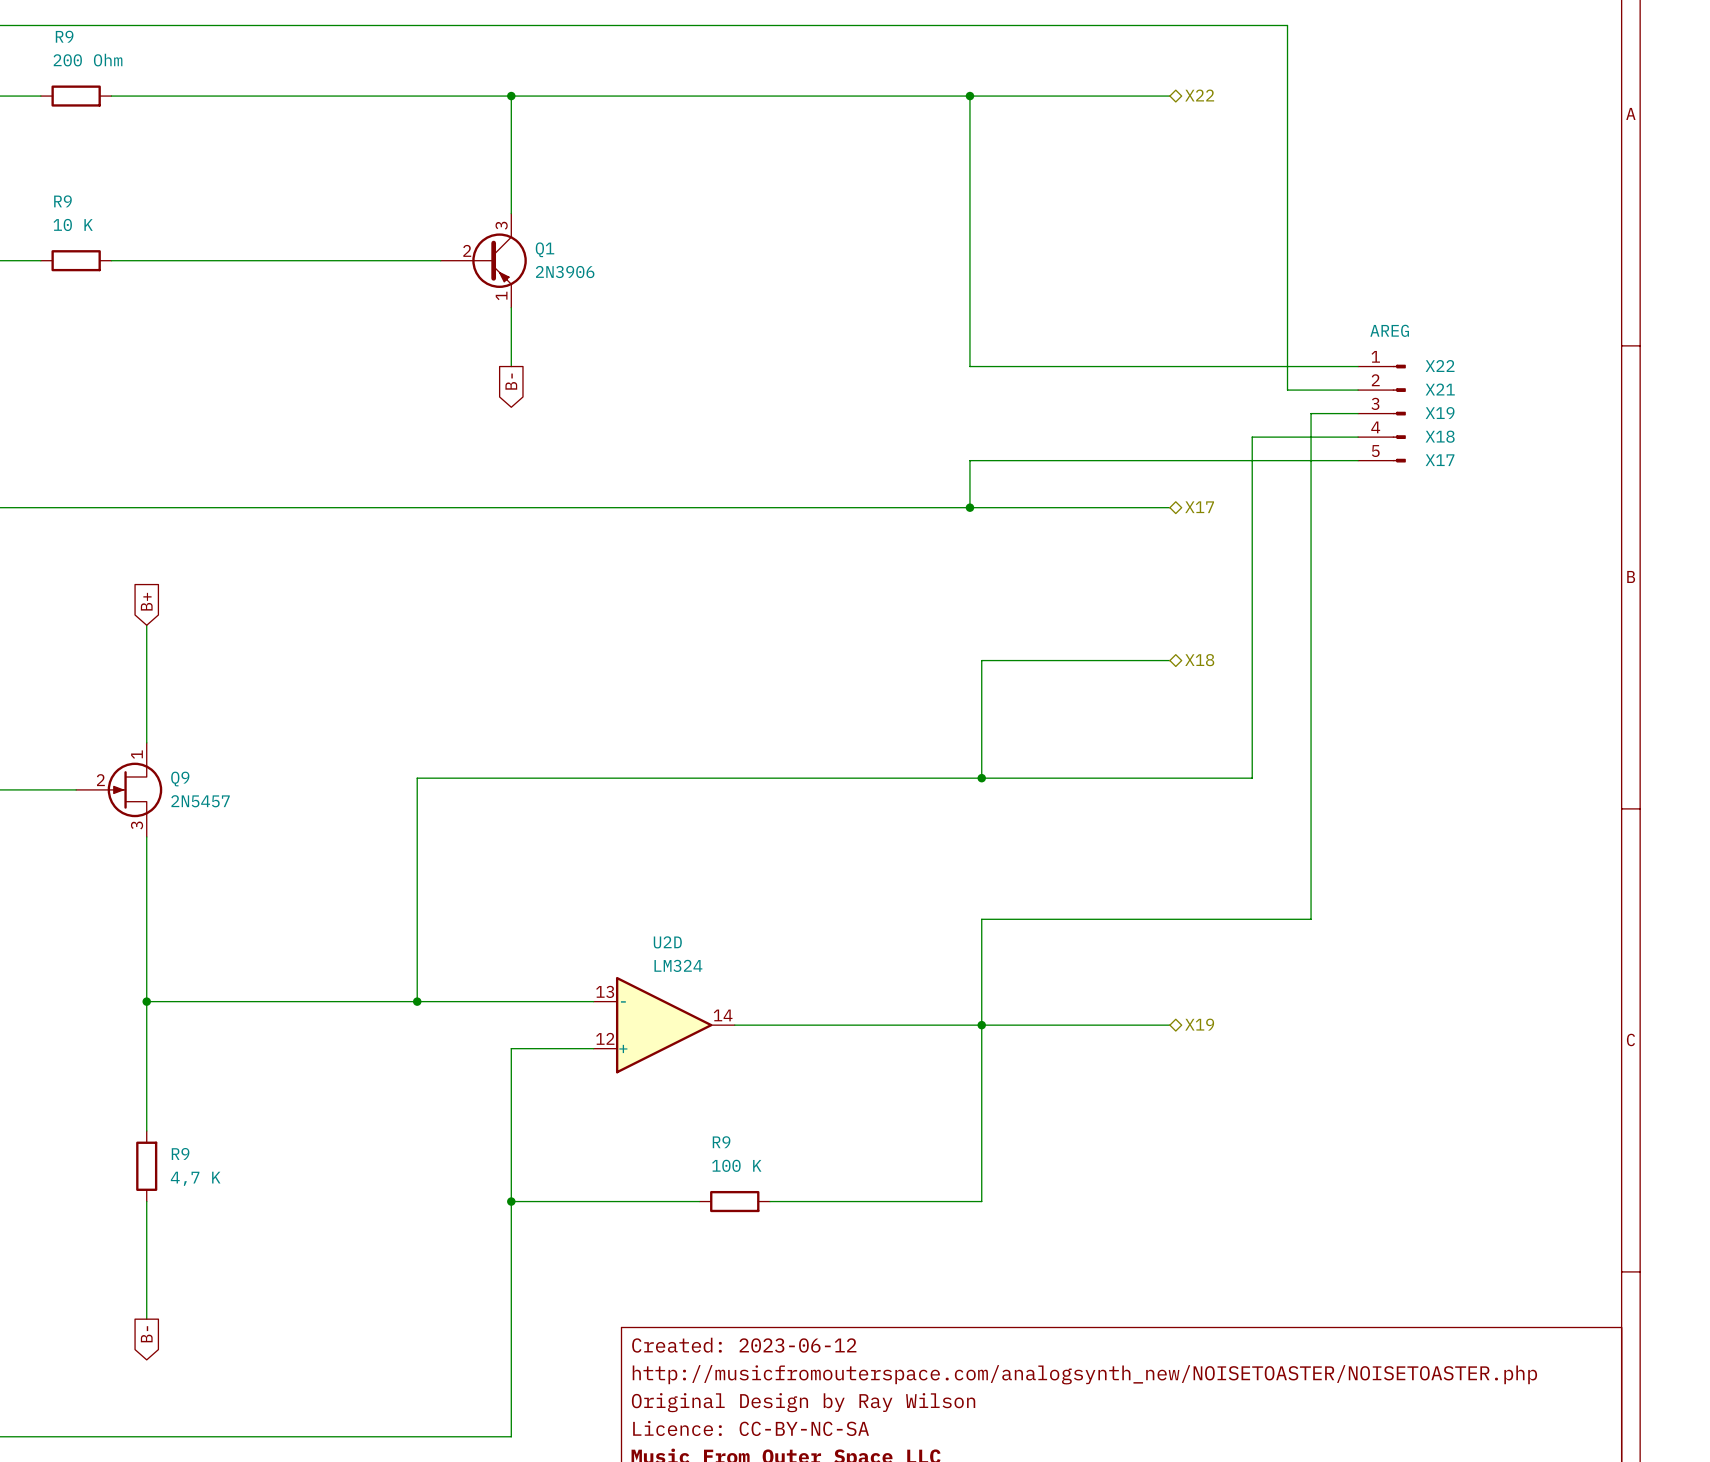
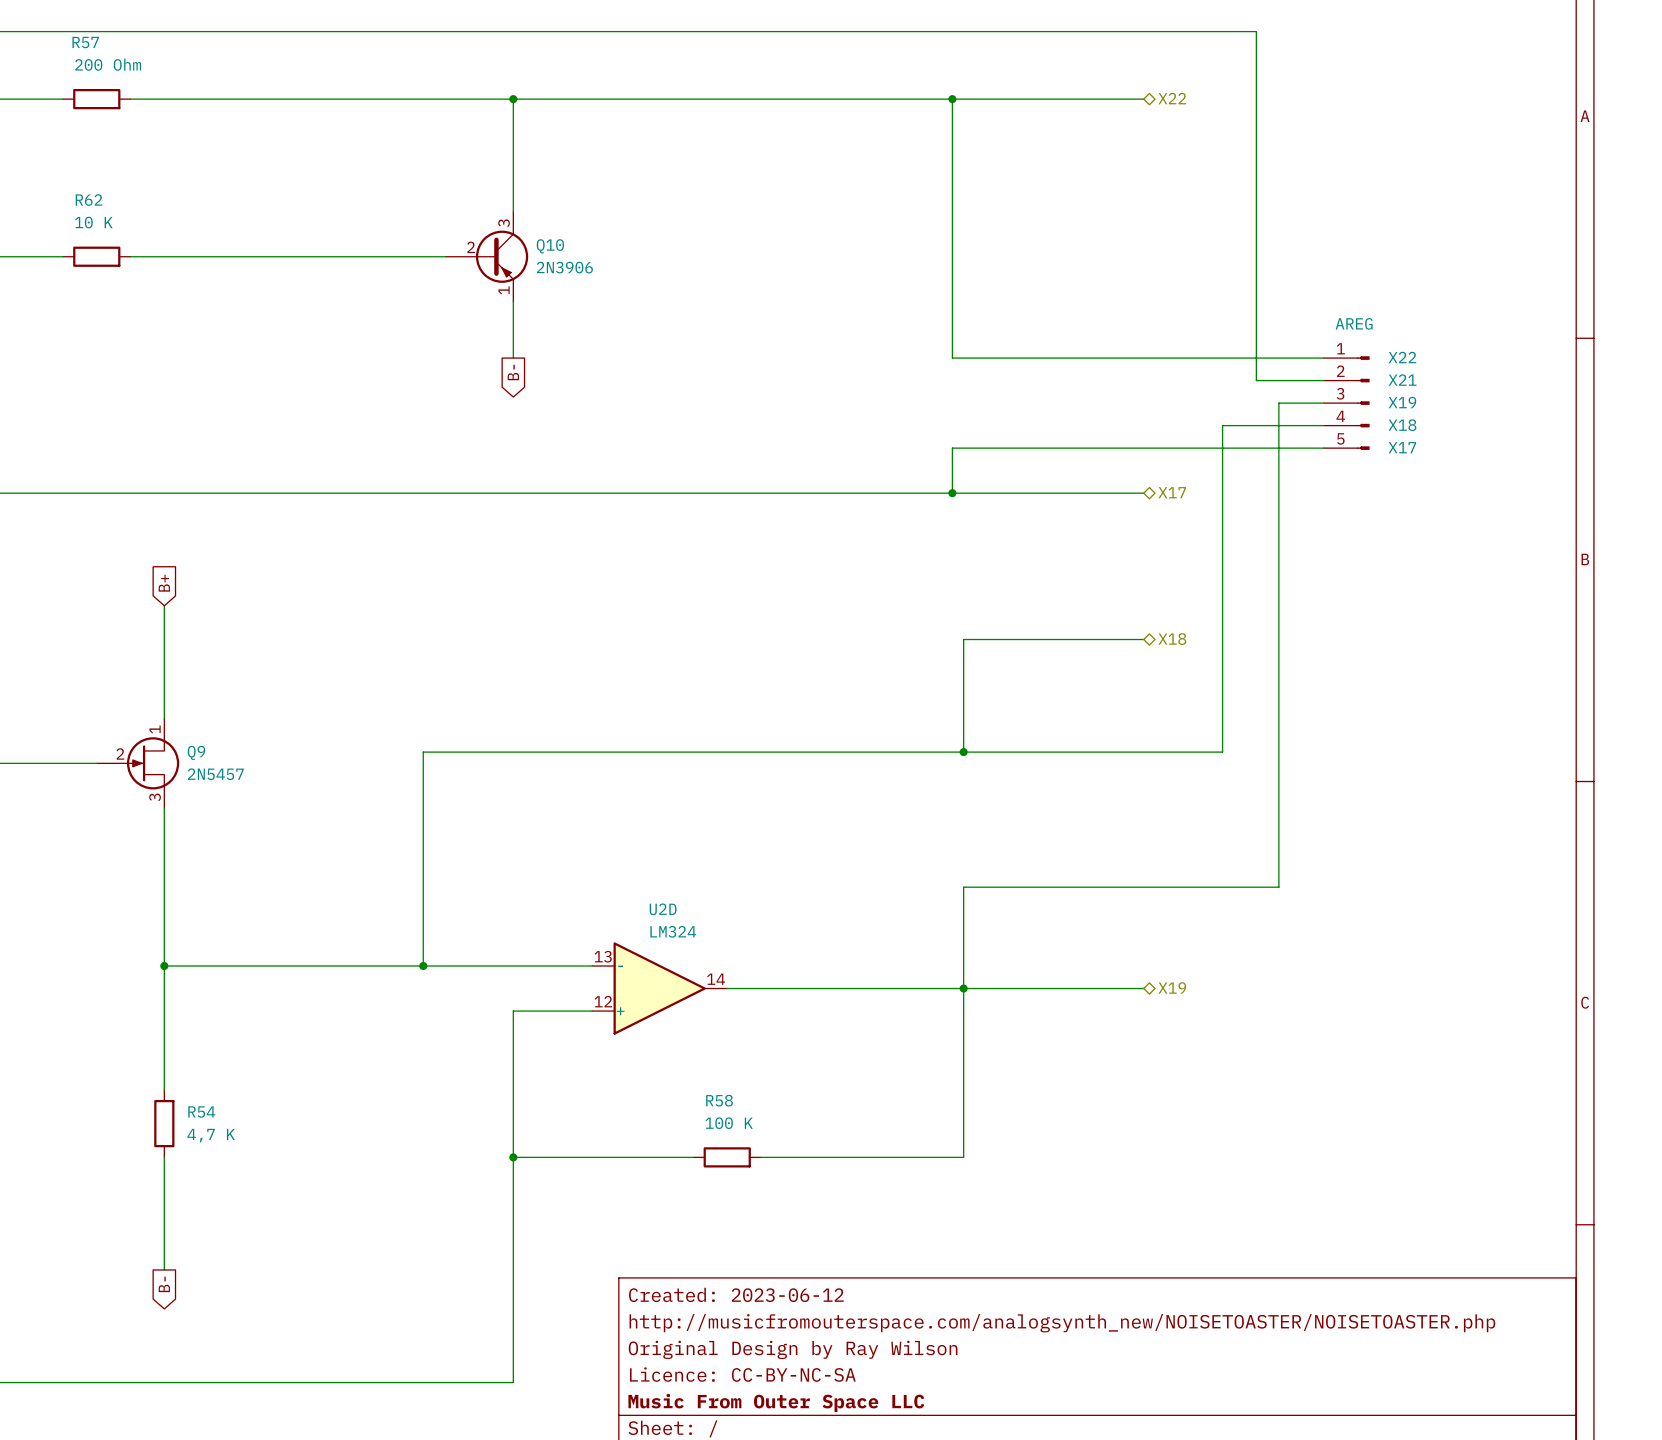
R9 name: R9 (64, 36) -> R57 (85, 42)
R9 name: R9 (62, 201) -> R62 (89, 200)
Q1 name: Q1 (545, 249) -> Q10 (550, 246)
R9 name: R9 (721, 1142) -> R58 (719, 1100)
R9 name: R9 (180, 1153) -> R54 (201, 1112)

